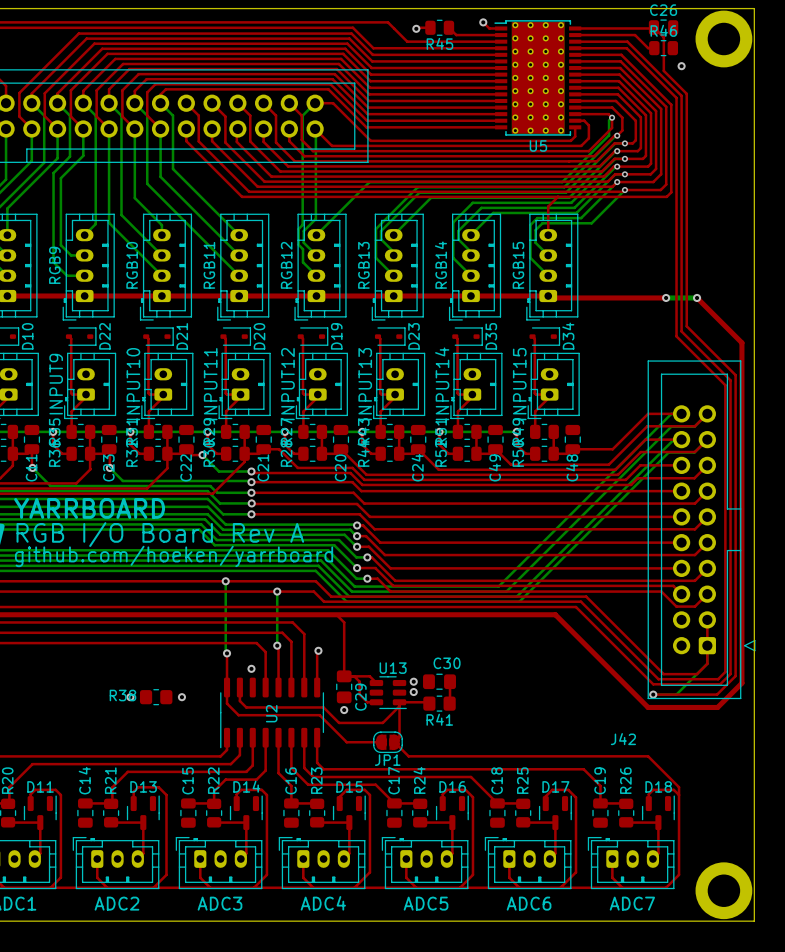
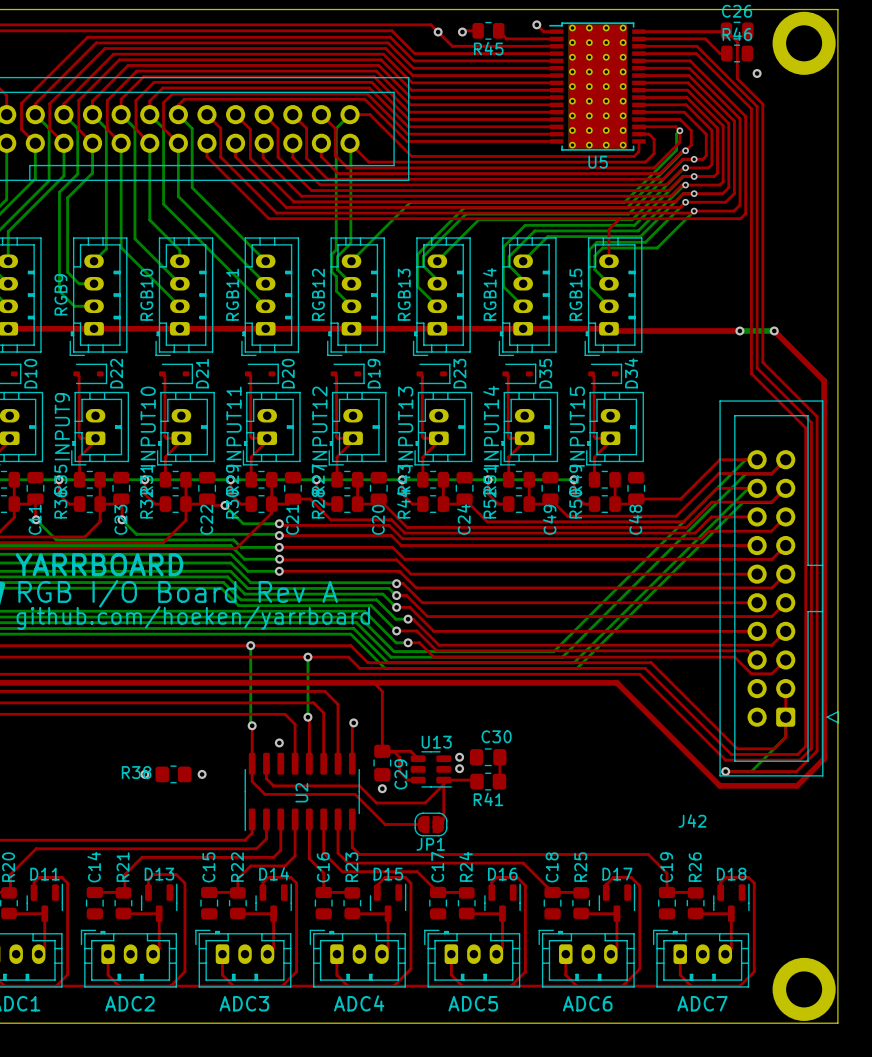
via: none -> (438, 32)
top track: (394, 742) (408, 756) (648, 756) (679, 787) (679, 795) -> none

